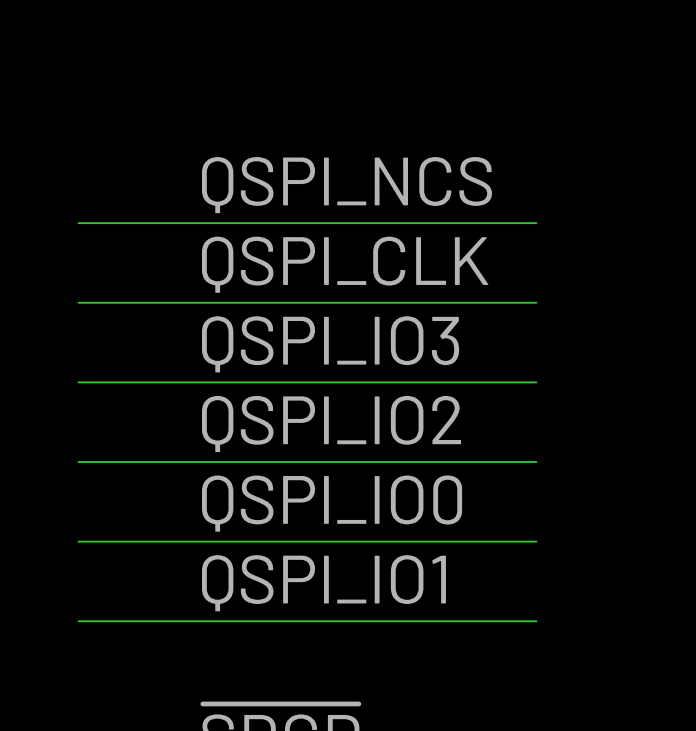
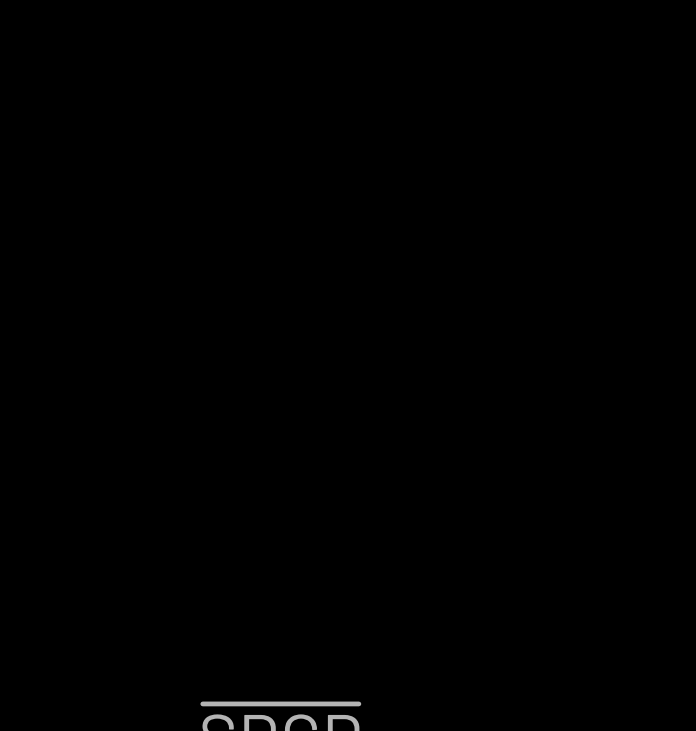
label: QSPI_NCS (346, 185) -> none
wire: (78, 223) (536, 223) -> none
label: QSPI_CLK (345, 264) -> none
wire: (78, 302) (536, 302) -> none
label: QSPI_IO3 (330, 344) -> none
wire: (78, 382) (536, 382) -> none
label: QSPI_IO2 (331, 423) -> none
wire: (78, 462) (536, 462) -> none
label: QSPI_IO0 (332, 503) -> none
wire: (78, 541) (536, 541) -> none
label: QSPI_IO1 (323, 583) -> none
wire: (78, 621) (536, 621) -> none

